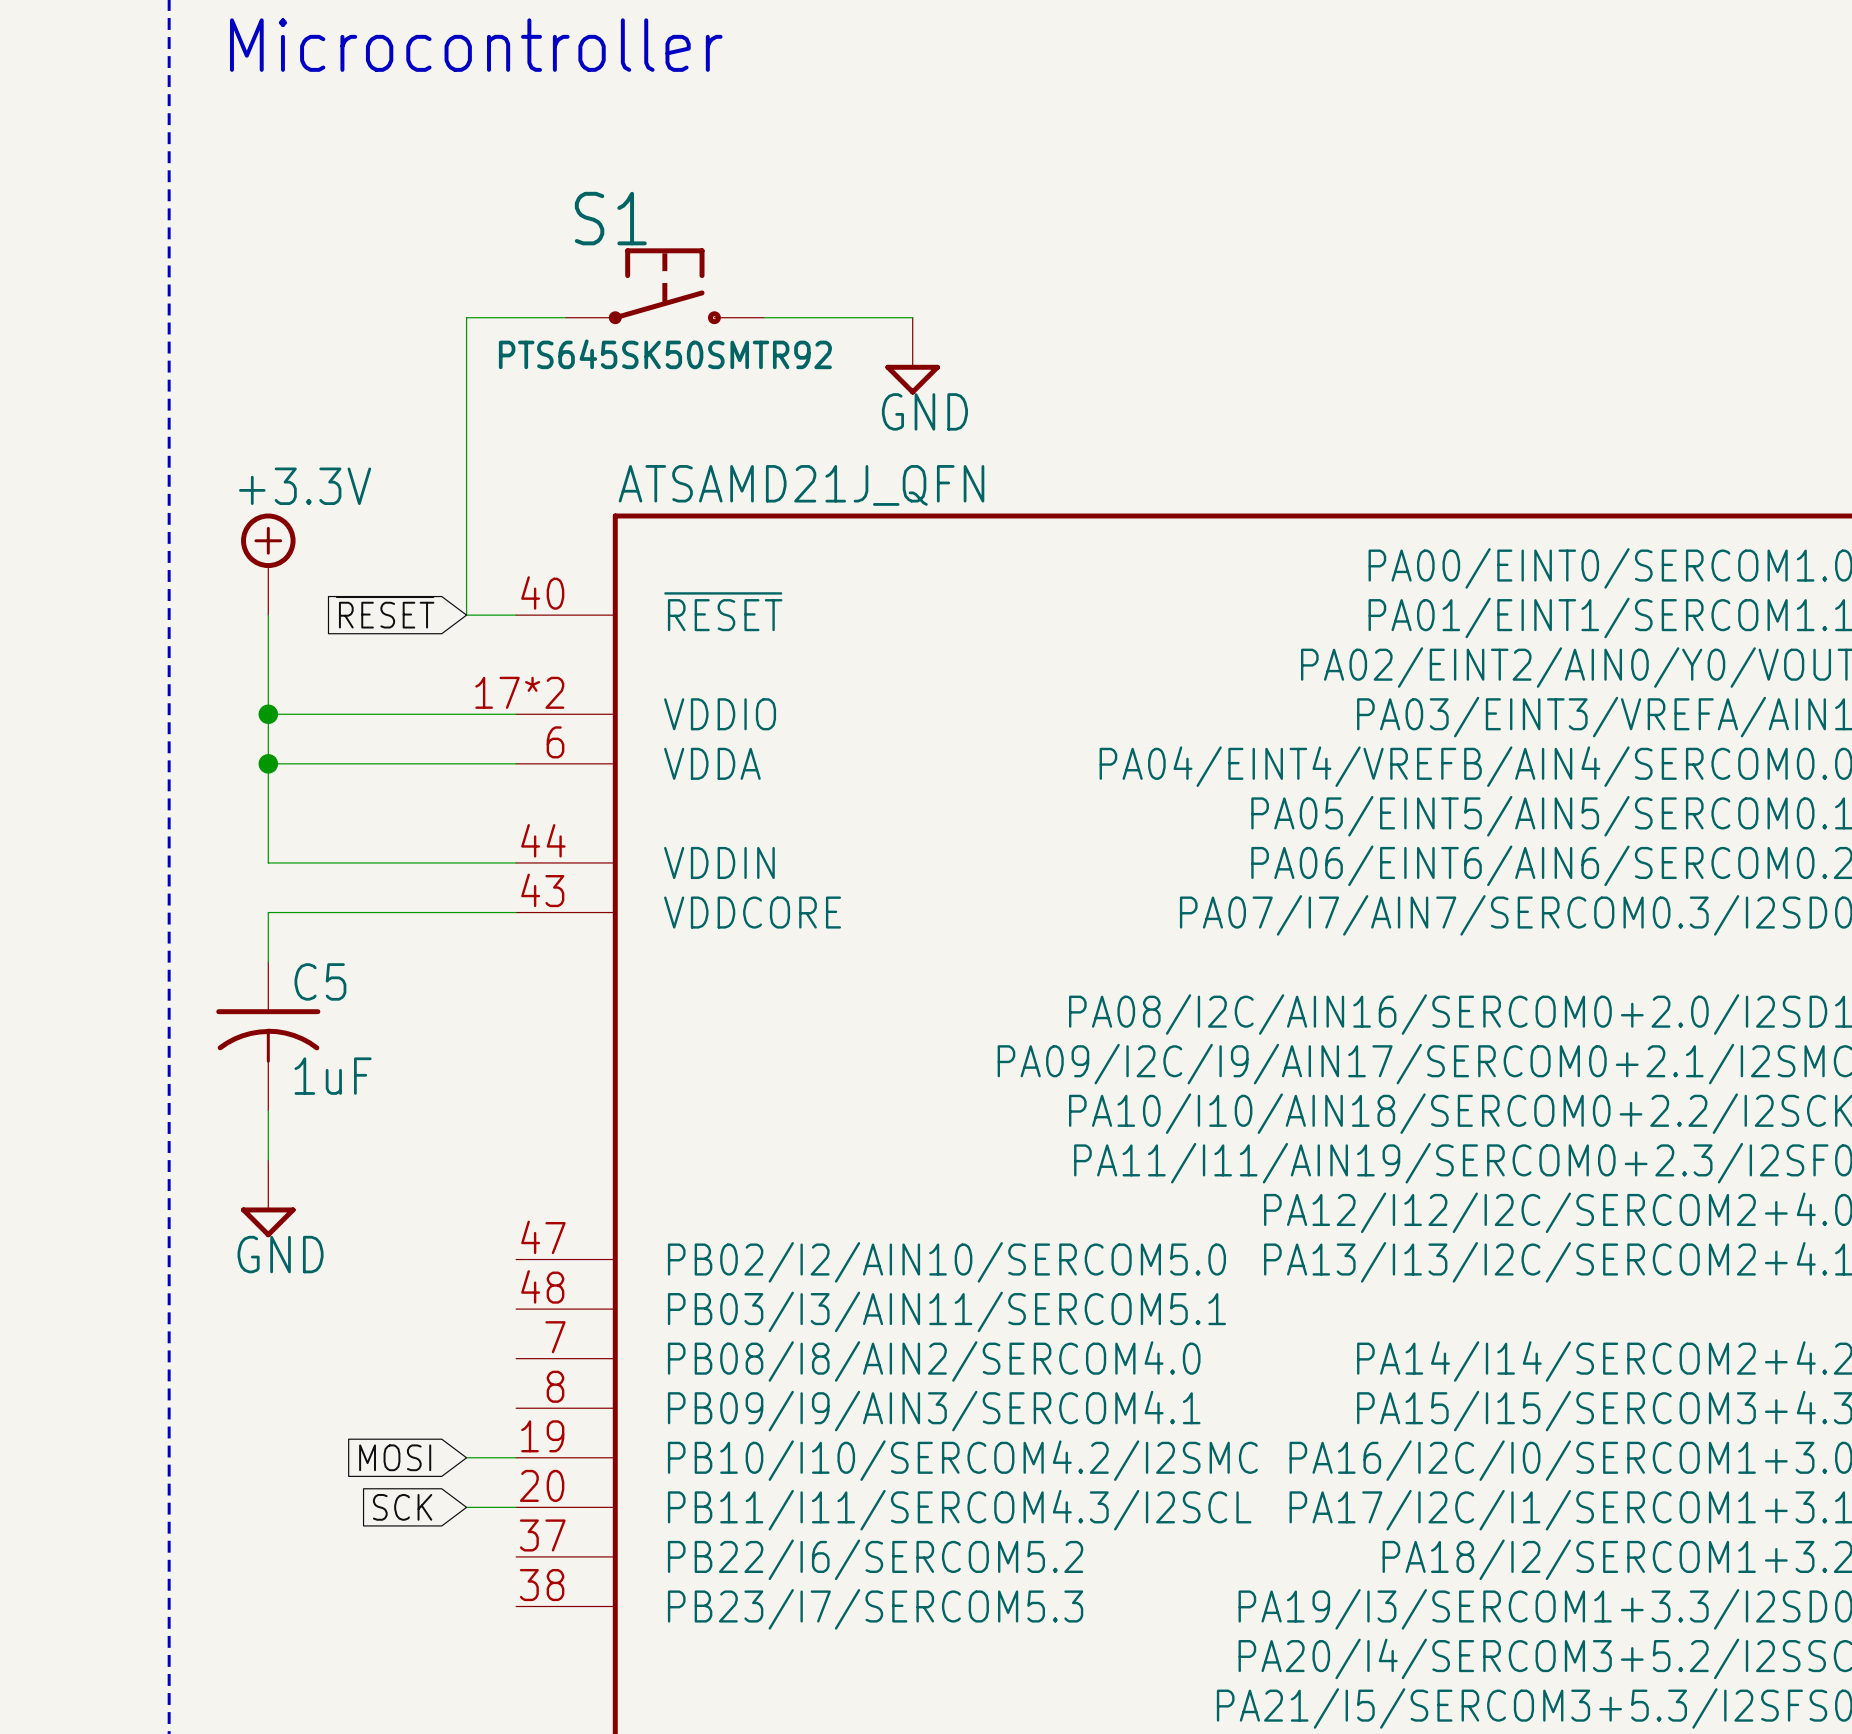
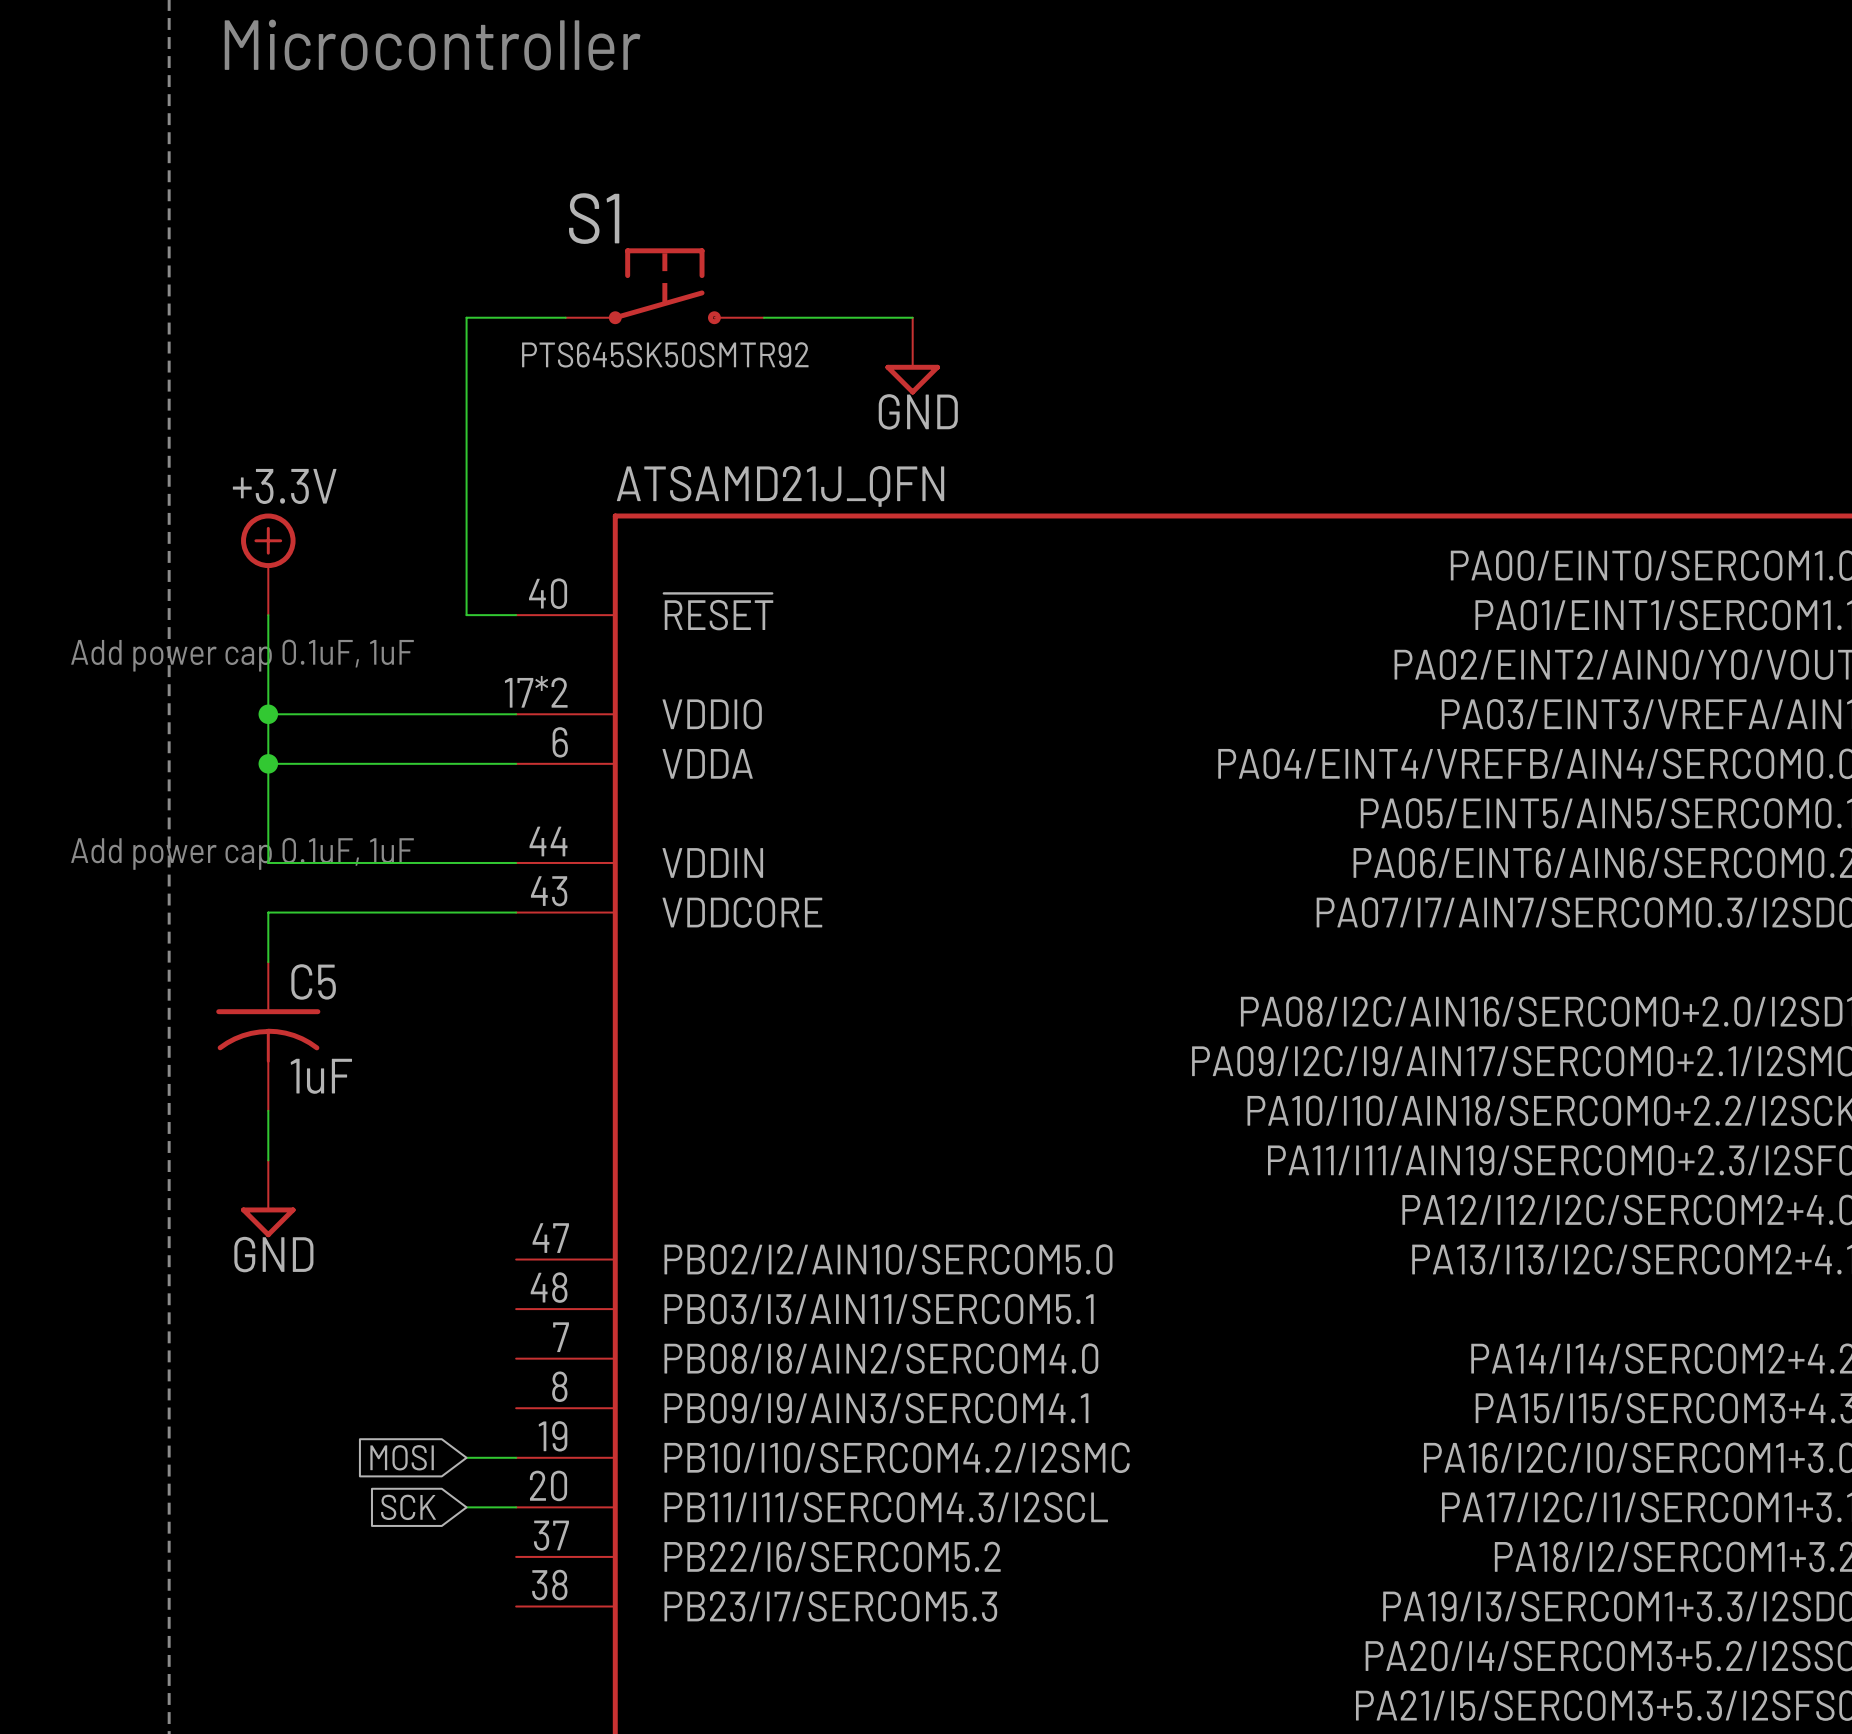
global label: ~{RESET} (385, 612) -> none
text: none -> Add power cap 0.1uF, 1uF (242, 655)
text: none -> Add power cap 0.1uF, 1uF (242, 853)

